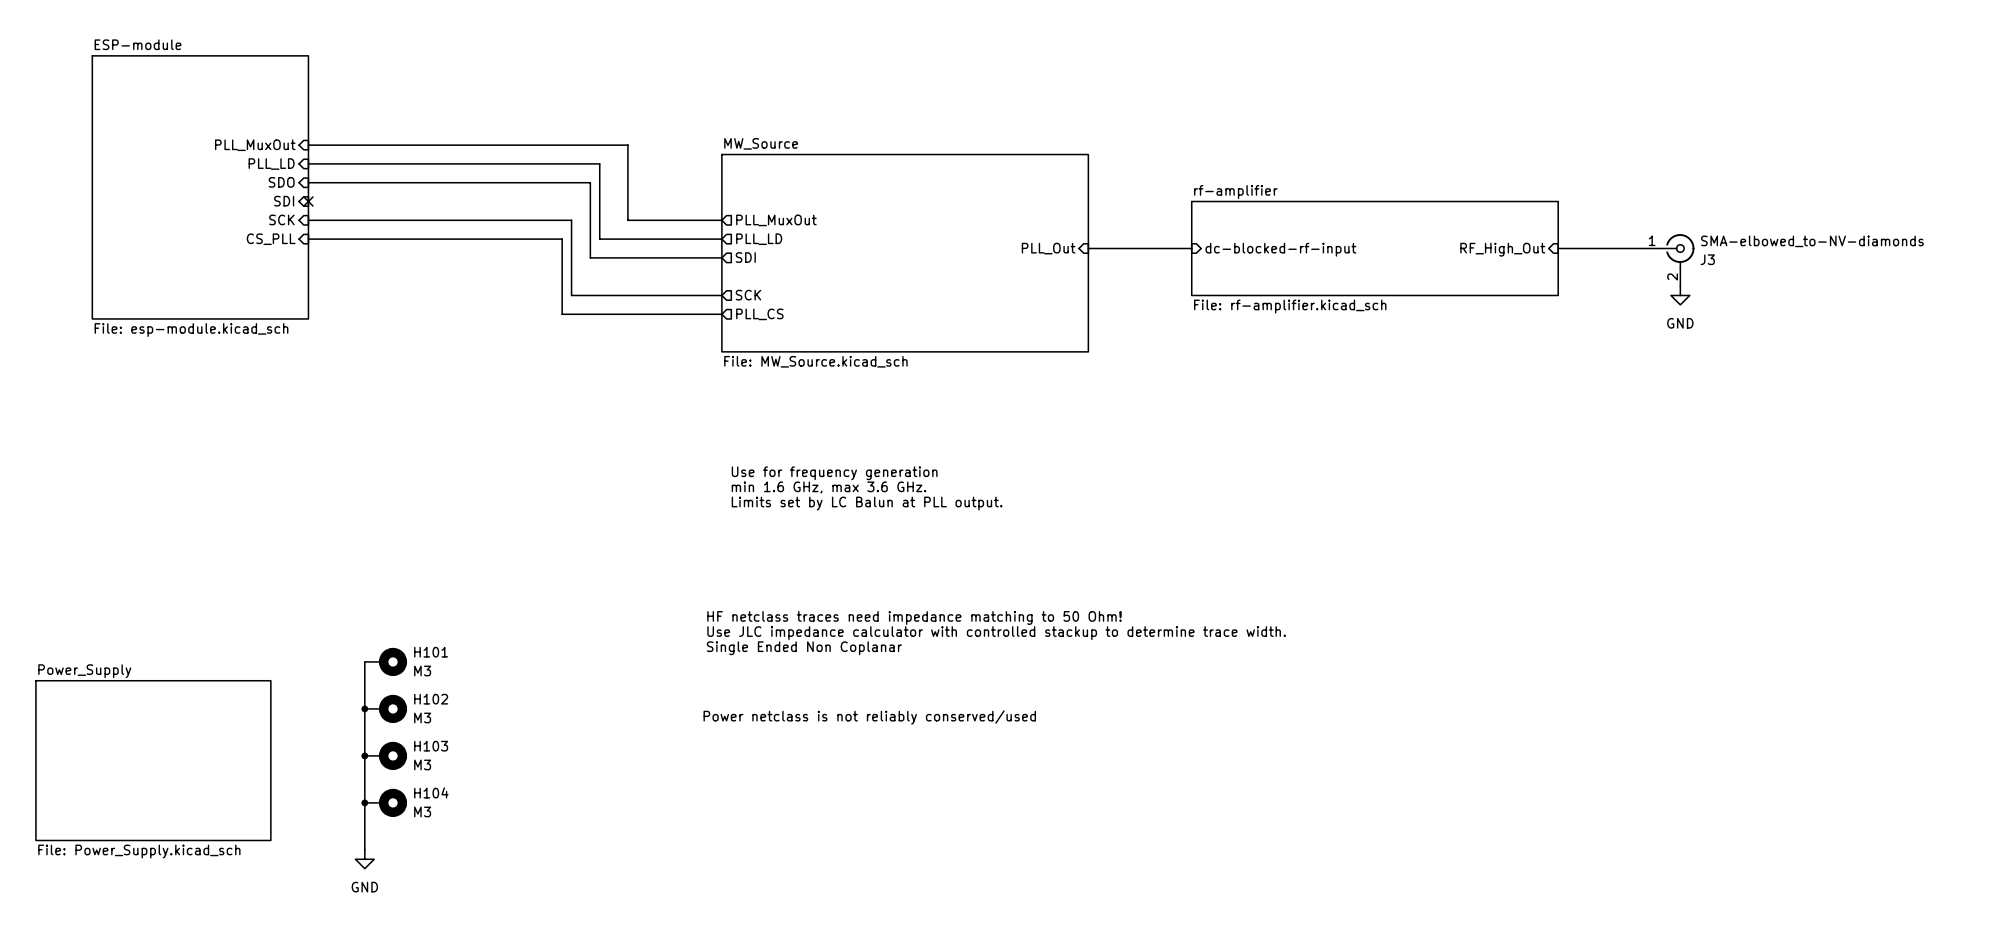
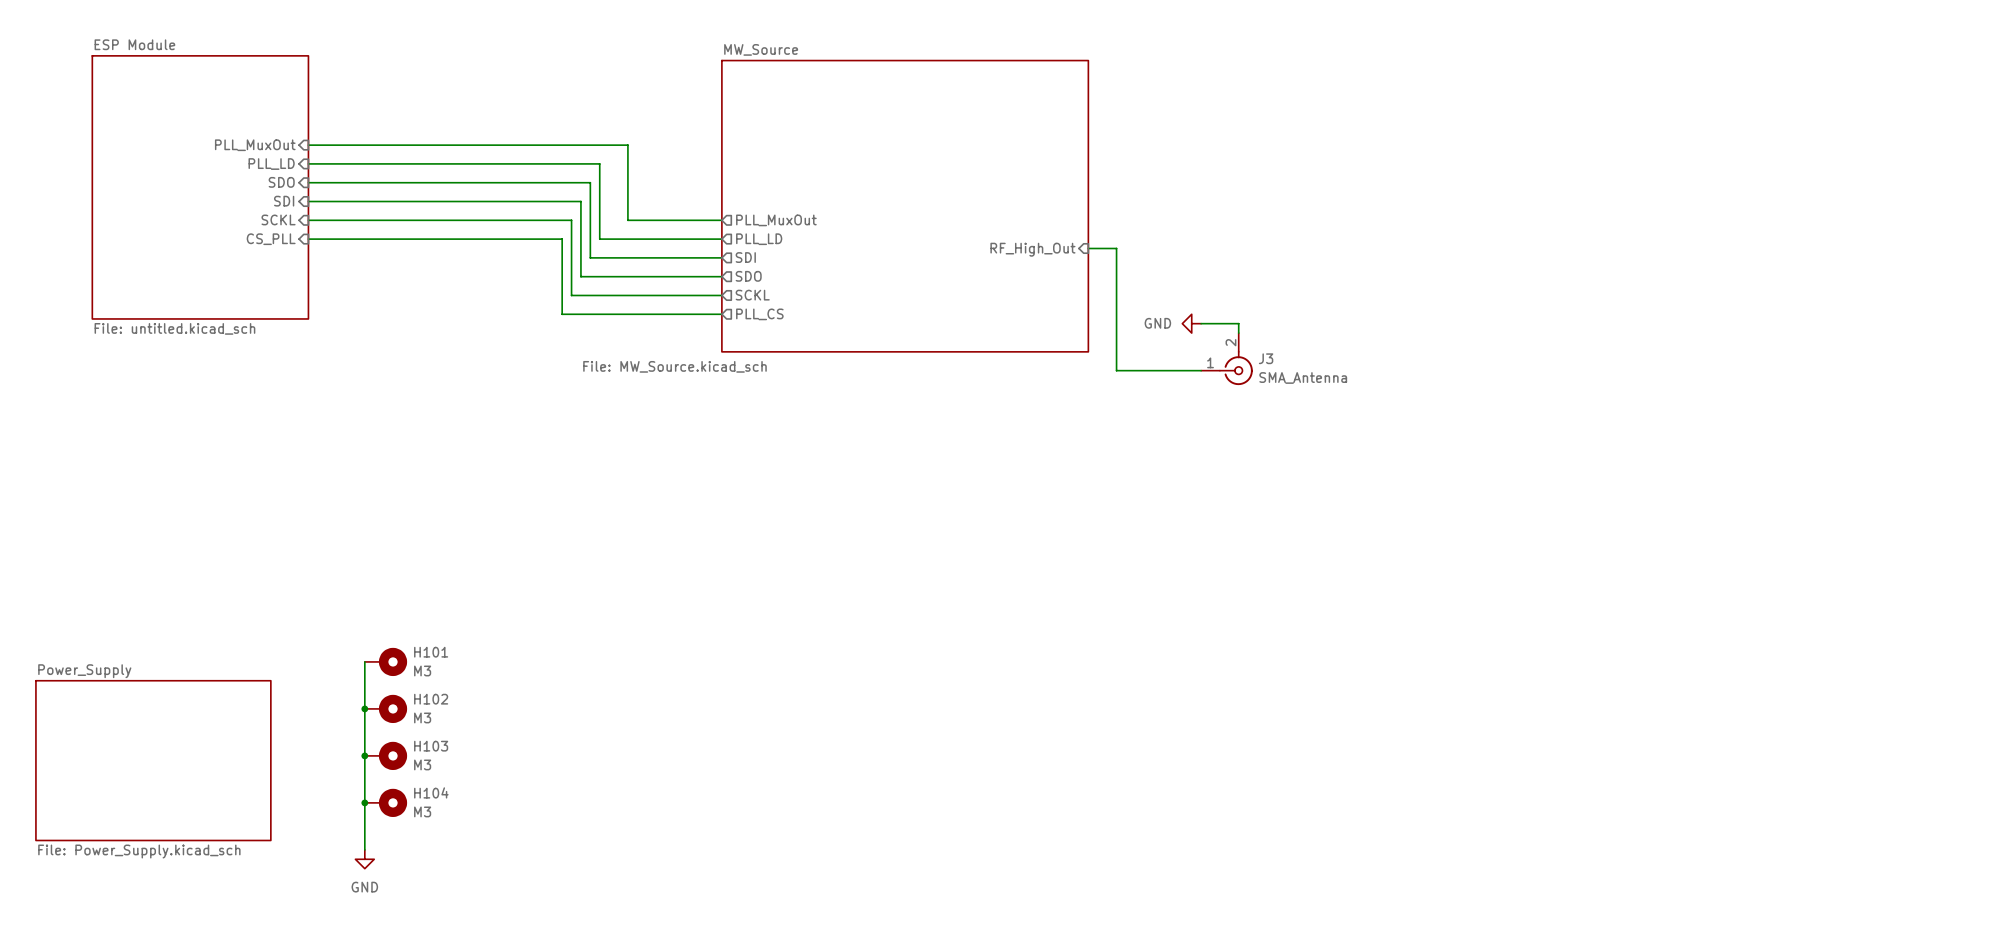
sheet ESP-module name: ESP-module (138, 44) -> ESP Module (134, 44)
wire: none -> (308, 201) (580, 201) (580, 276) (721, 276)
no-connect mark: (308, 201) -> none
sheet MW_Source: none -> File: MW_Source.kicad_sch (905, 206)
sheet pin: SCK (281, 219) -> SCKL (278, 219)
J3 value: SMA-elbowed_to-NV-diamonds (1812, 241) -> SMA_Antenna (1303, 377)
sheet pin: PLL_Out (1048, 248) -> RF_High_Out (1032, 249)
wire: (1116, 248) (1191, 248) -> (1116, 248) (1116, 370) (1201, 370)
sheet rf-amplifier: File: rf-amplifier.kicad_sch (1374, 248) -> none
wire: (1558, 248) (1642, 248) -> none
sheet pin: dc-blocked-rf-input (1280, 249) -> none
sheet pin: RF_High_Out (1502, 249) -> none
J3 flip: as is (1678, 250) -> up-down (1236, 368)
sheet MW_Source: File: MW_Source.kicad_sch (905, 253) -> none
J3 position: (1668, 260) -> (1226, 359)
sheet pin: none -> SDO (748, 276)
sheet pin: SCK (748, 295) -> SCKL (752, 295)
power symbol: GND (1680, 295) -> none
power symbol: none -> GND (1191, 323)
wire: none -> (1201, 323) (1238, 323) (1238, 333)
sheet ESP-module value: File: esp-module.kicad_sch (191, 330) -> File: untitled.kicad_sch (174, 328)
text: Use for frequency generation (834, 473) -> none
text: min 1.6 GHz, max 3.6 GHz. (829, 487) -> none
text: Limits set by LC Balun at PLL output. (867, 503) -> none
text: HF netclass traces need impedance matching to 50 Ohm! (914, 617) -> none
text: Use JLC impedance calculator with controlled stackup to determine trace width. (996, 633) -> none
text: Single Ended Non Coplanar (804, 648) -> none
text: Power netclass is not reliably conserved/used (869, 717) -> none

